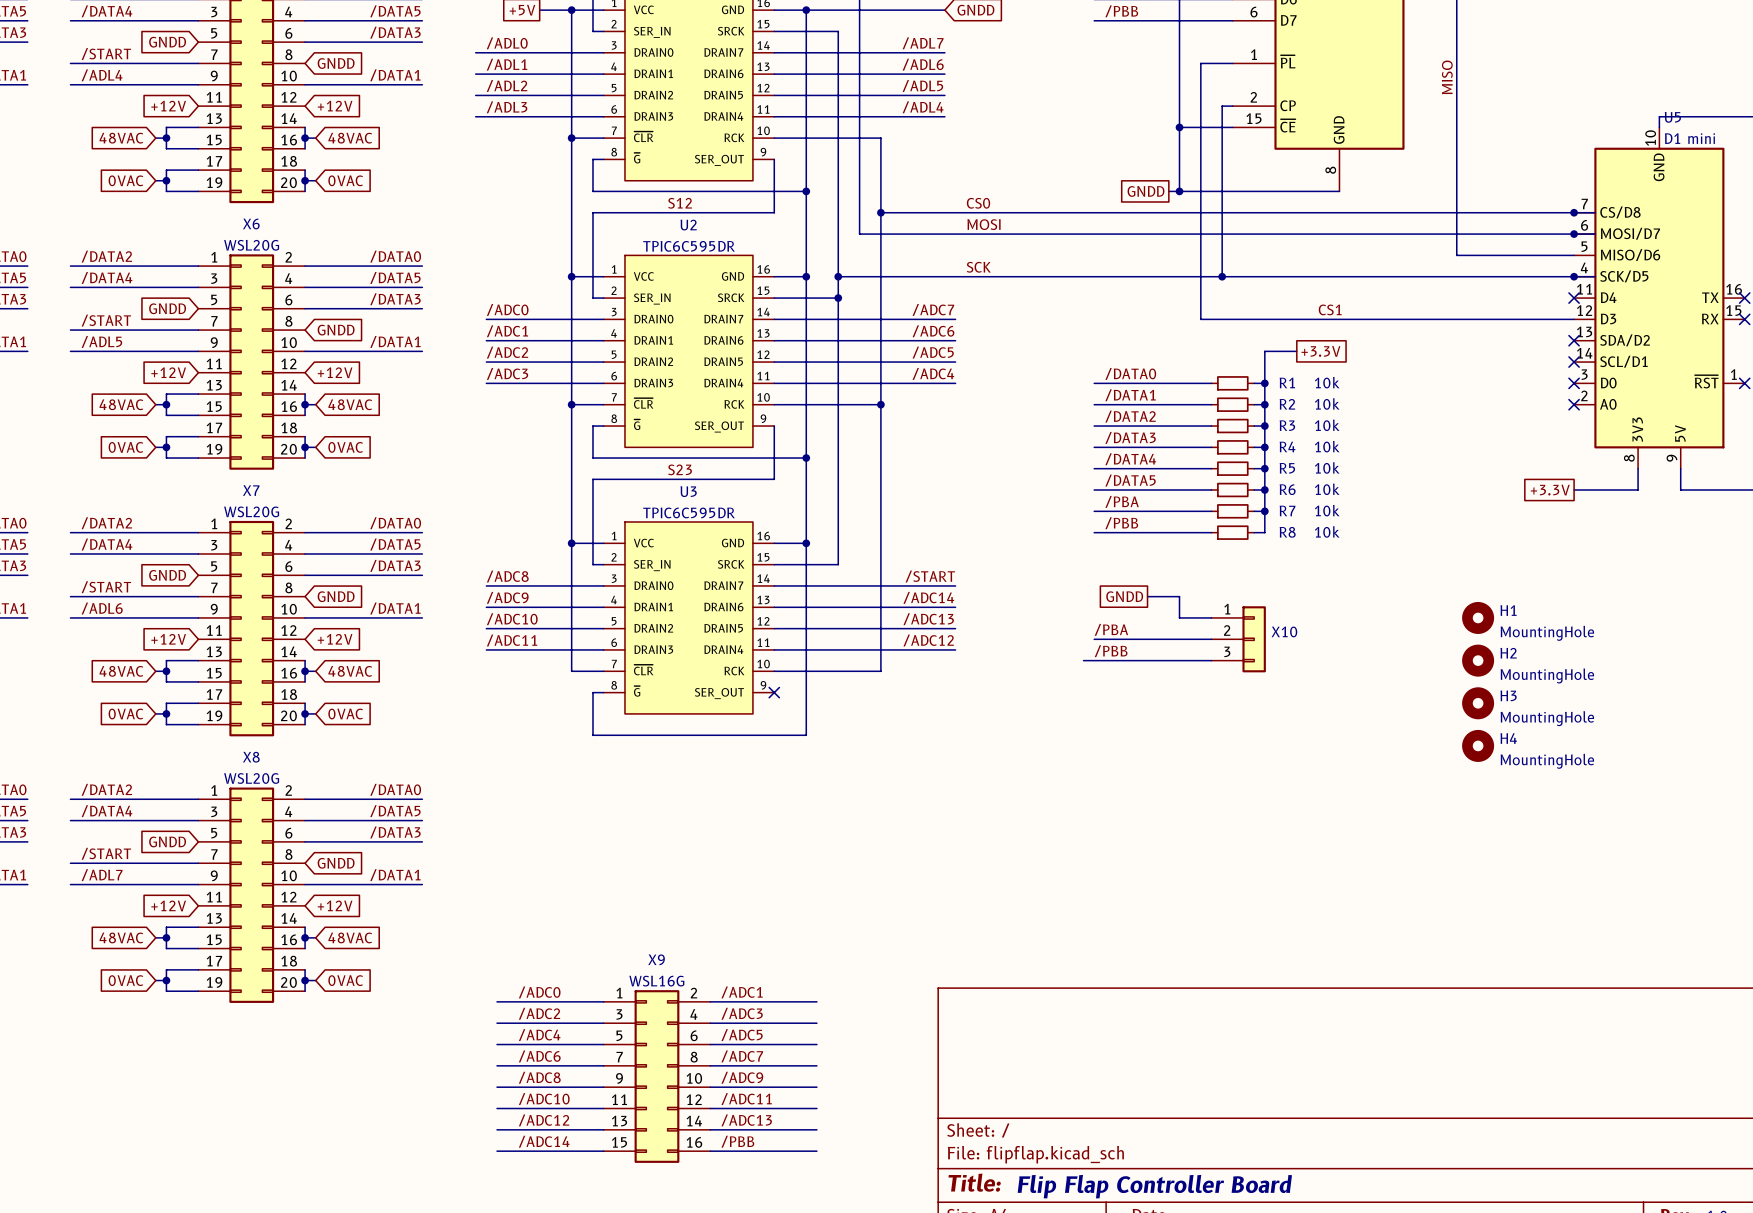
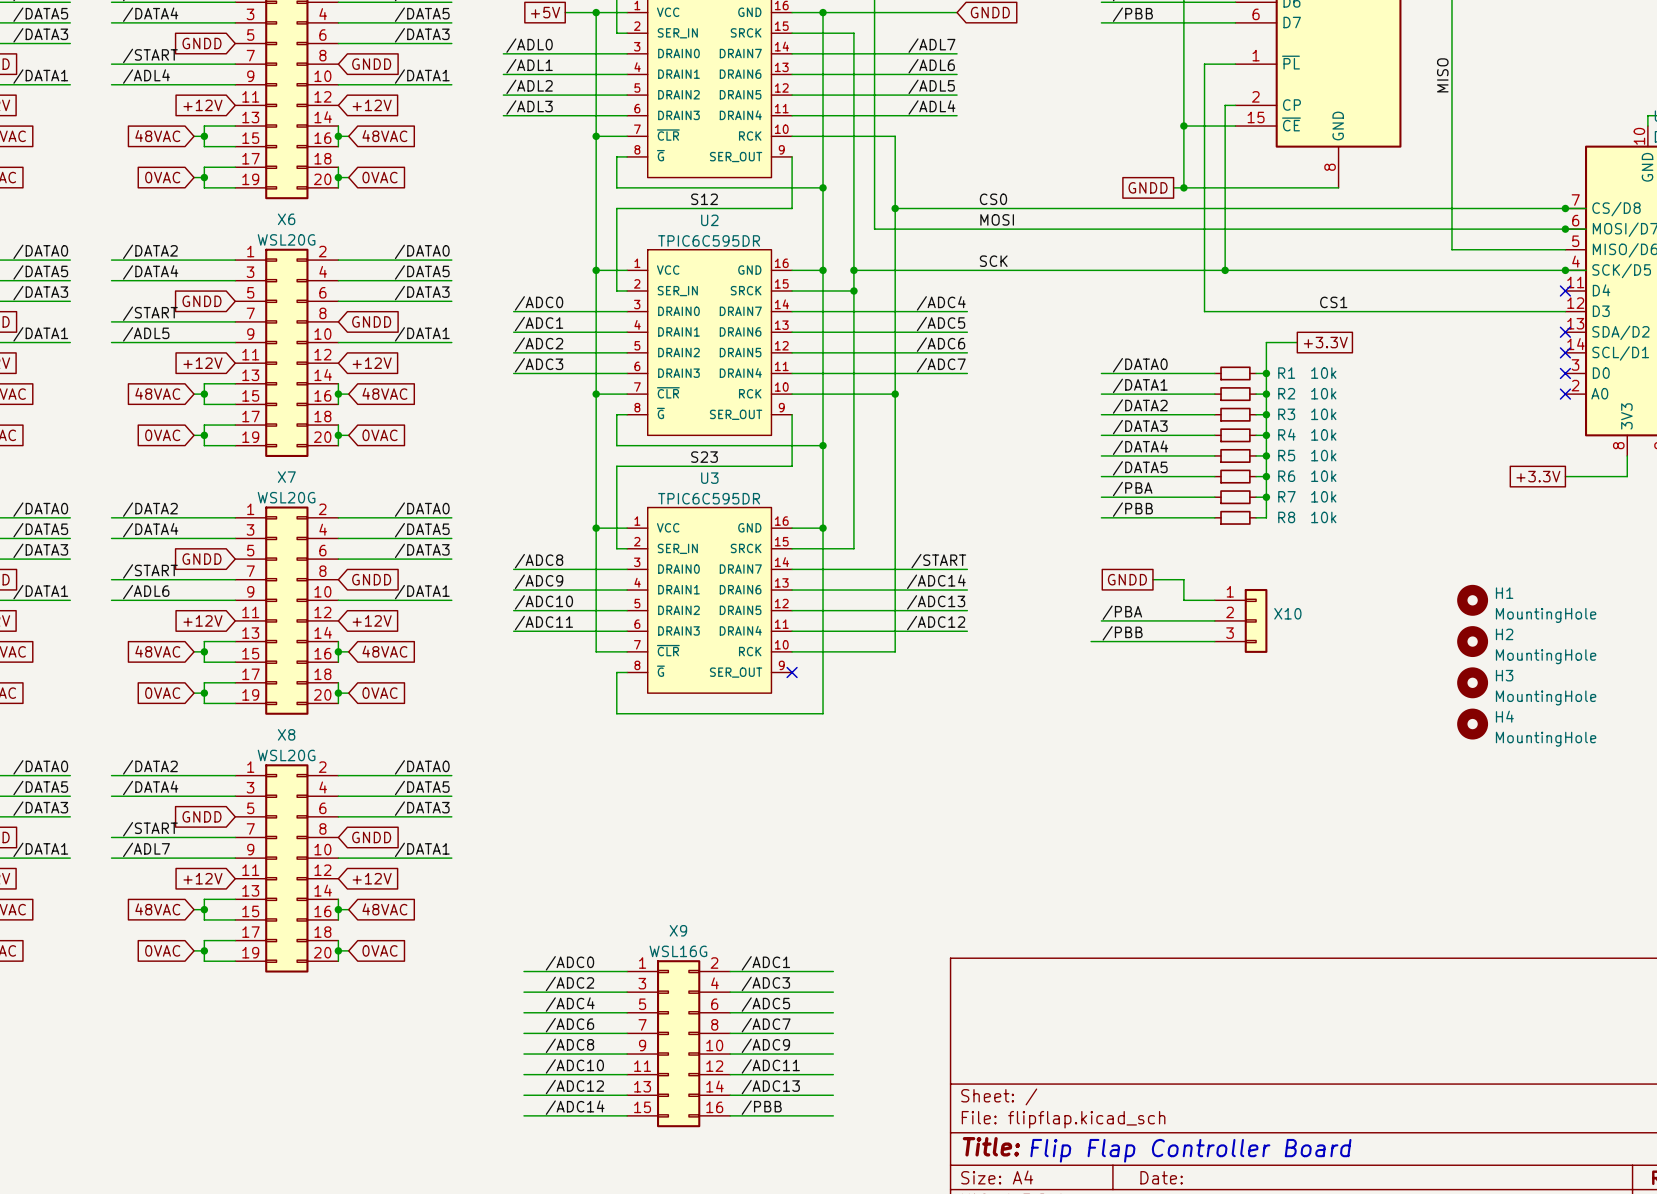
label: /ADC7 (933, 309) -> /ADC4 (941, 303)
label: /ADC6 (933, 331) -> /ADC5 (941, 324)
label: /ADC5 (933, 352) -> /ADC6 (941, 344)
label: /ADC4 (933, 373) -> /ADC7 (941, 365)

